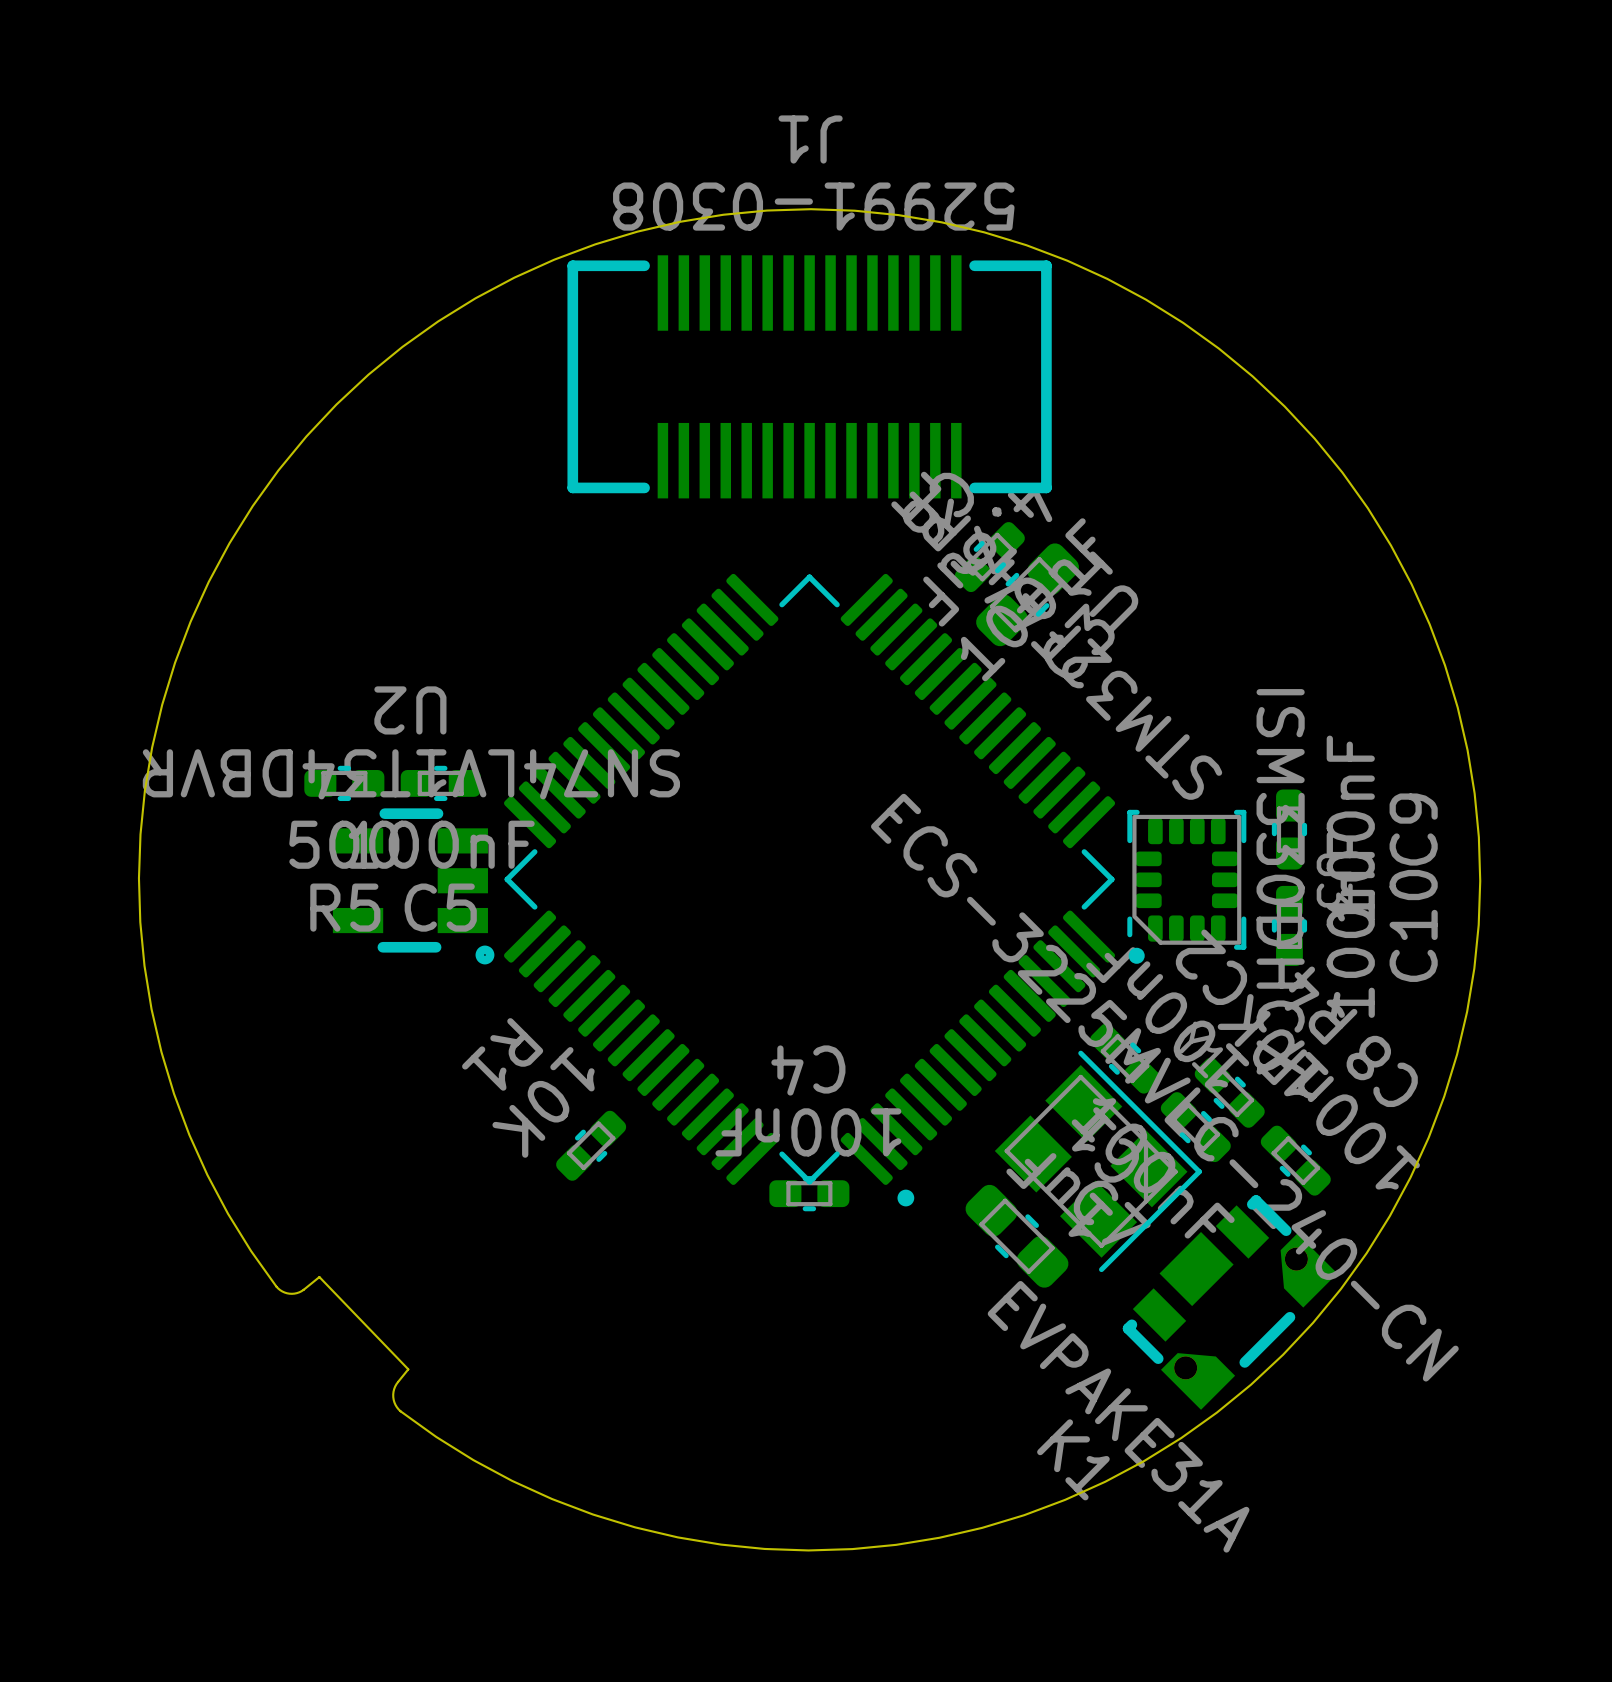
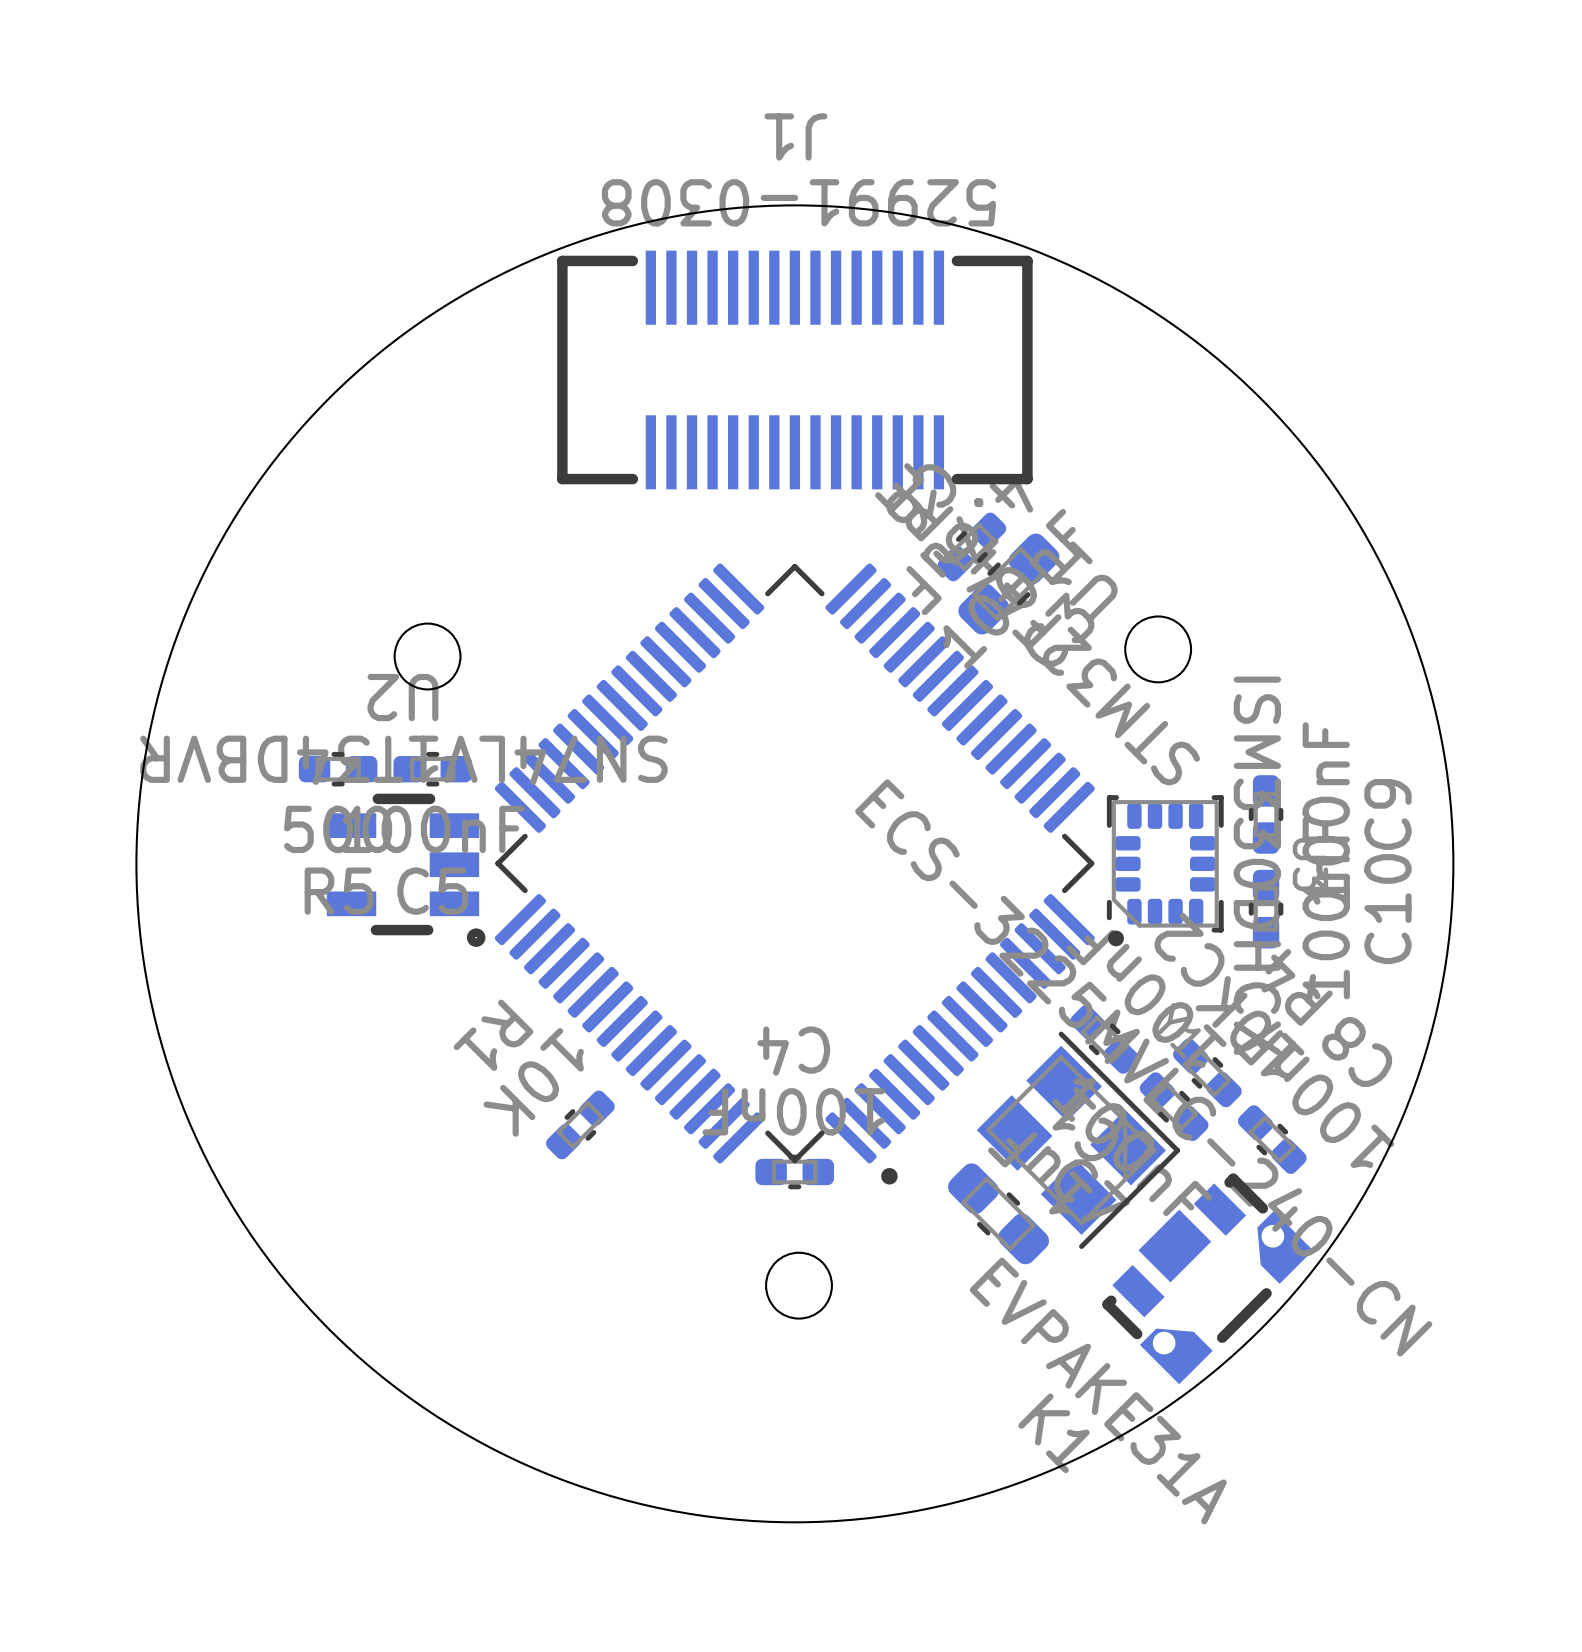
round board edge: none -> [135, 204, 1455, 1524]
round board edge: none -> [1124, 615, 1193, 684]
round board edge: none -> [393, 622, 462, 691]
round board edge: none -> [765, 1251, 833, 1320]
board edge: (398, 1381) (408, 1369) (319, 1277) (296, 1293) (287, 1293) (280, 1290) (251, 1251) (228, 1213) (189, 1135) (174, 1093) (161, 1051) (144, 965) (140, 922) (140, 834) (144, 790) (162, 704) (175, 662) (208, 581) (229, 543) (278, 470) (336, 404) (368, 374) (402, 346) (475, 298) (554, 259) (595, 244) (680, 221) (723, 214) (767, 210) (854, 210) (941, 222) (984, 232) (1067, 260) (1107, 278) (1183, 322) (1218, 348) (1284, 406) (1314, 438) (1367, 508) (1391, 545) (1411, 584) (1445, 665) (1457, 707) (1474, 793) (1480, 881) (1478, 924) (1467, 1011) (1457, 1054) (1444, 1096) (1410, 1177) (1389, 1216) (1340, 1288) (1283, 1354) (1250, 1384) (1216, 1412) (1143, 1461) (1065, 1499) (1024, 1515) (982, 1527) (896, 1544) (808, 1550) (721, 1544) (635, 1527) (593, 1514) (512, 1480) (436, 1436) (396, 1407) (393, 1394) (398, 1381) -> none

